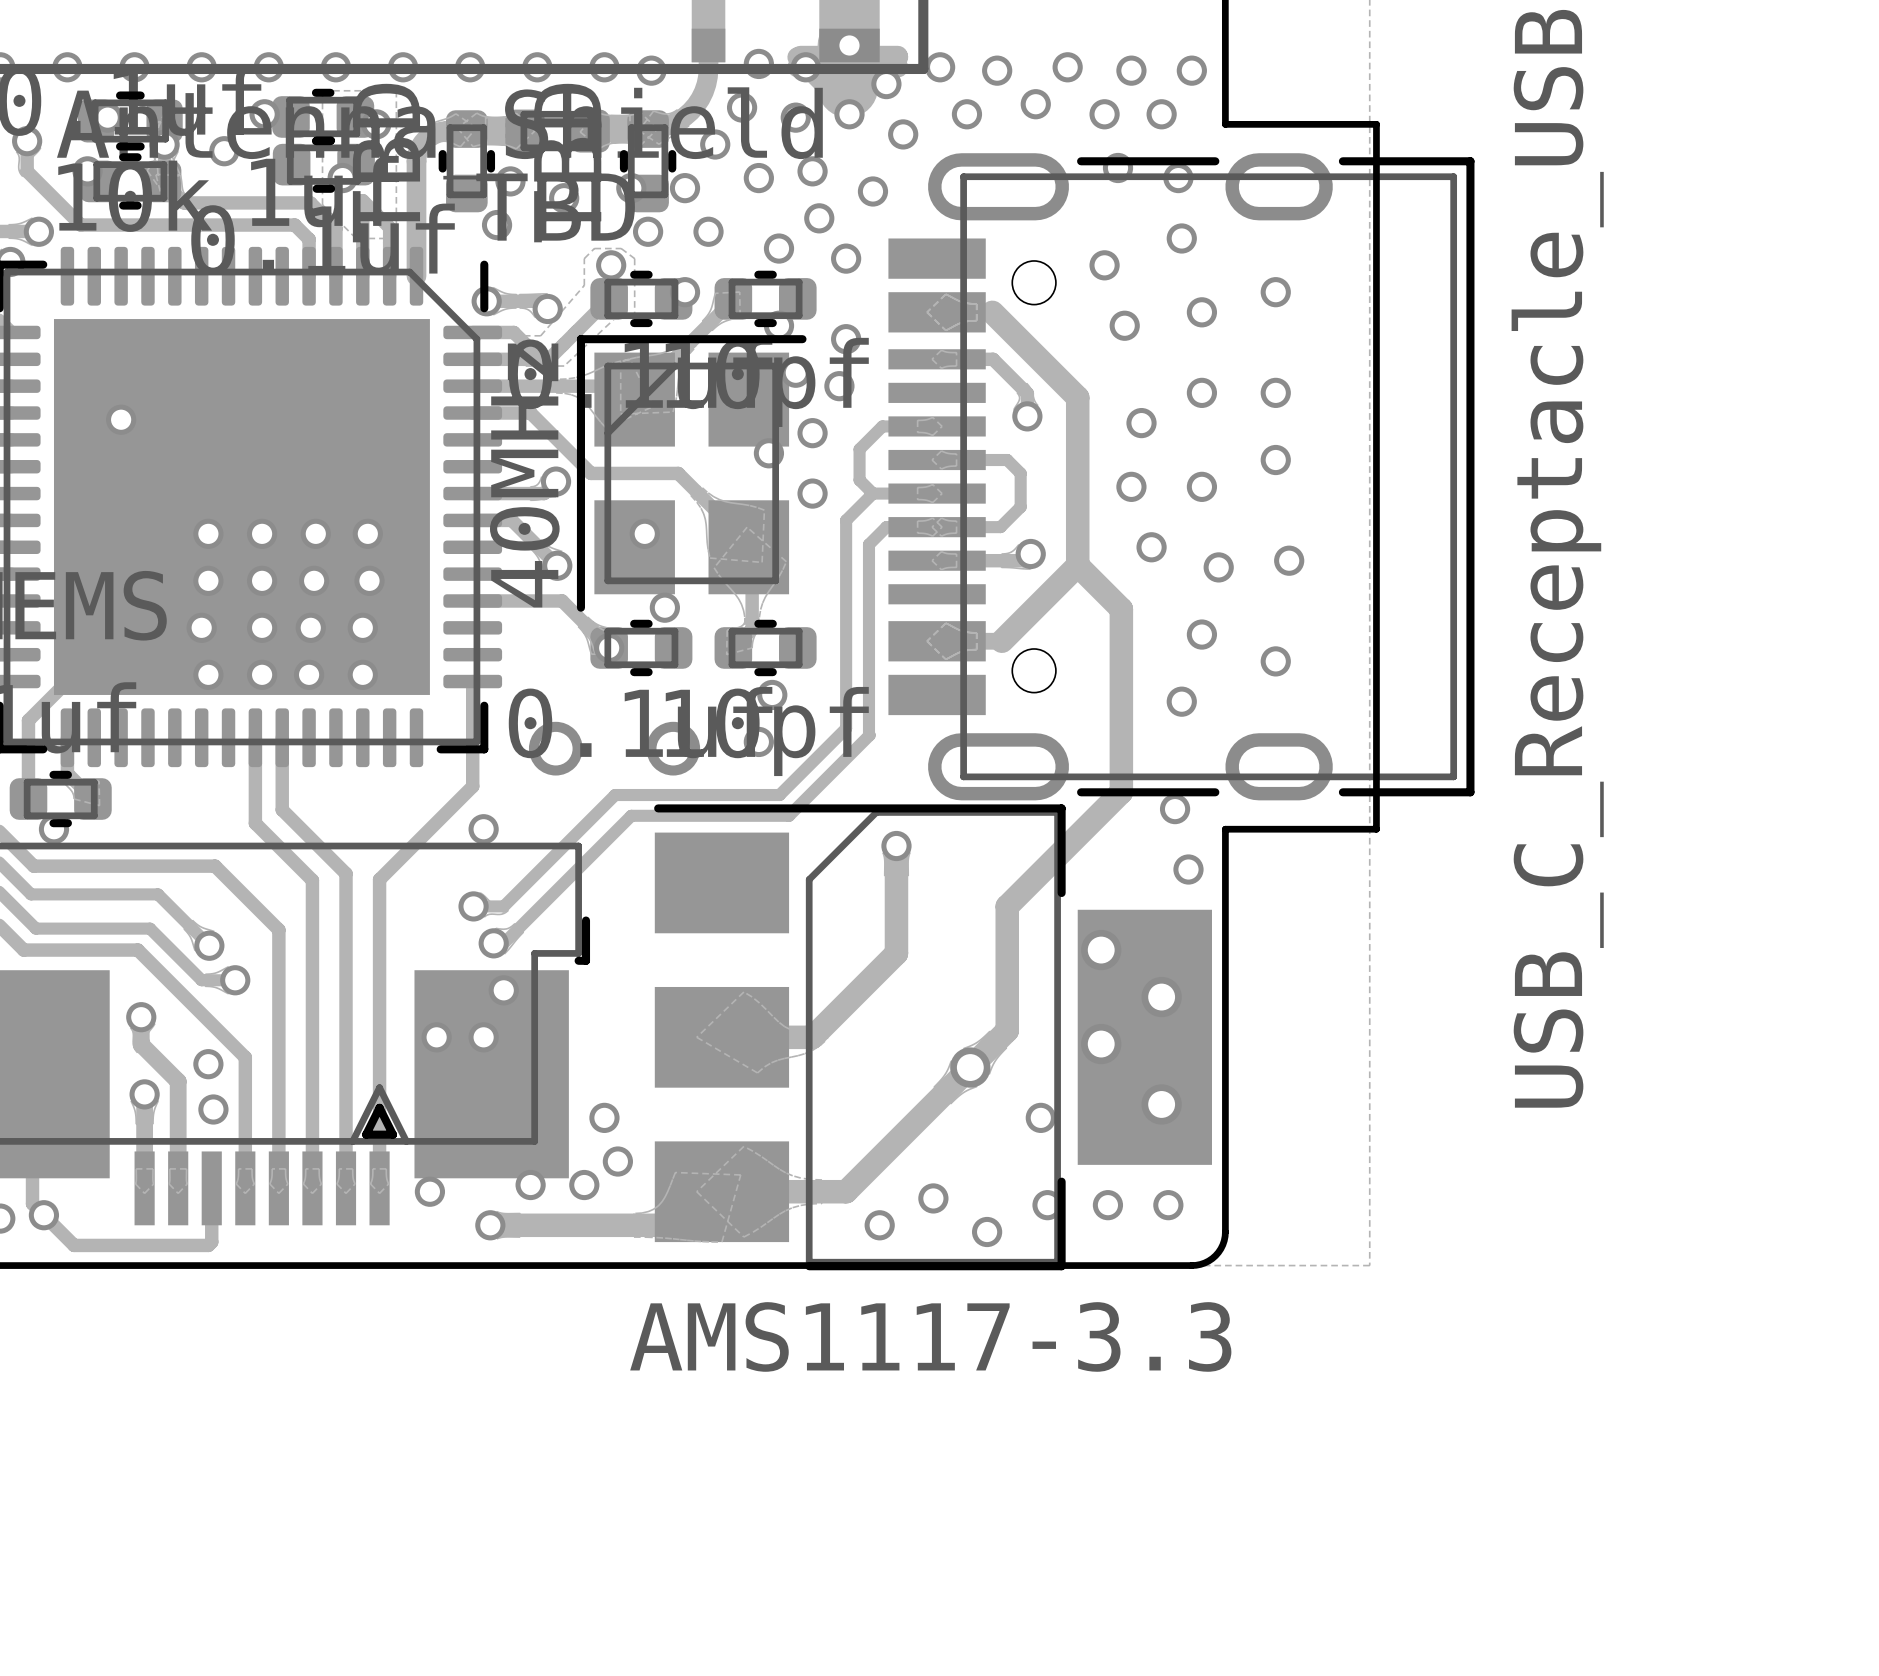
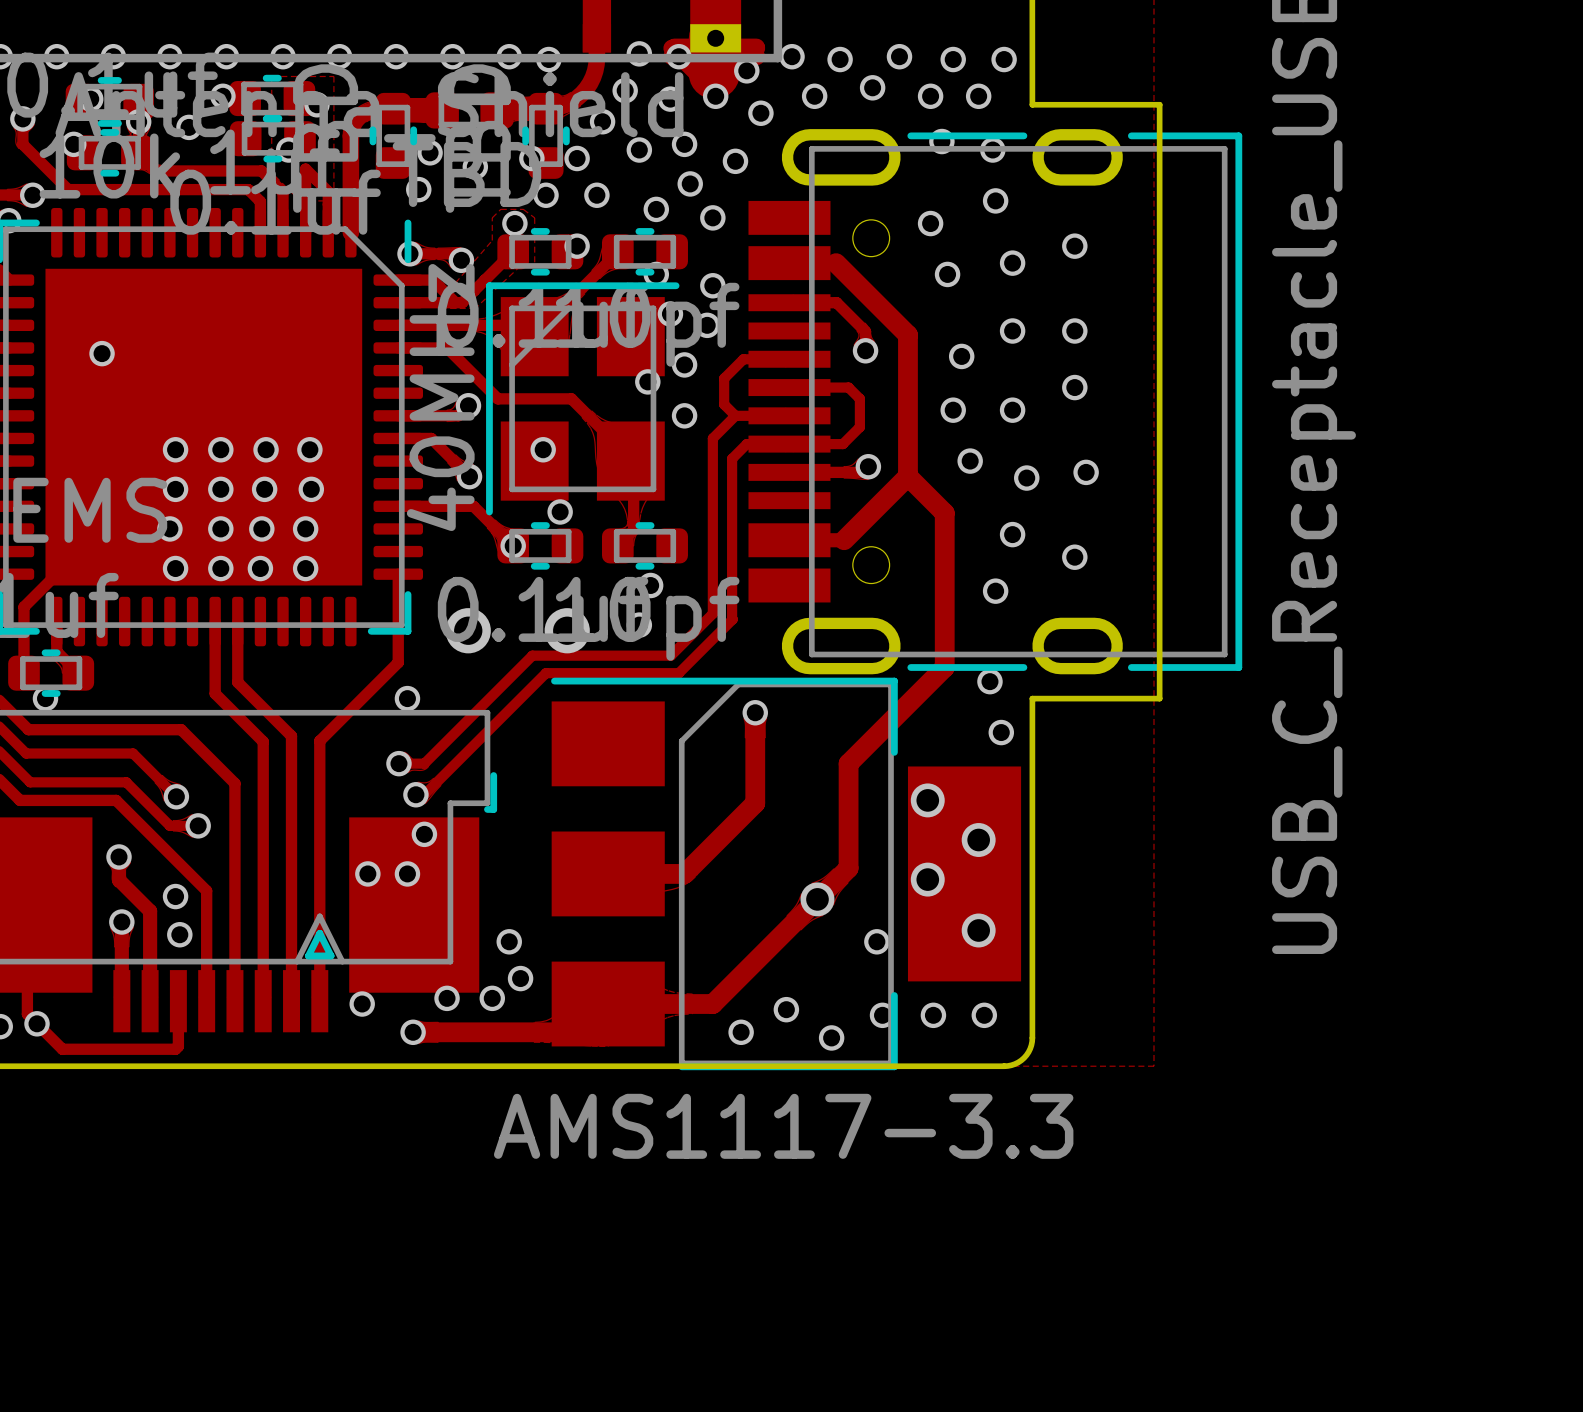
track: (796, 778) (779, 795) (615, 795) -> (670, 655) (532, 655) (518, 669)
track: (805, 799) (789, 815) (631, 815) -> (678, 673) (546, 673) (531, 687)

